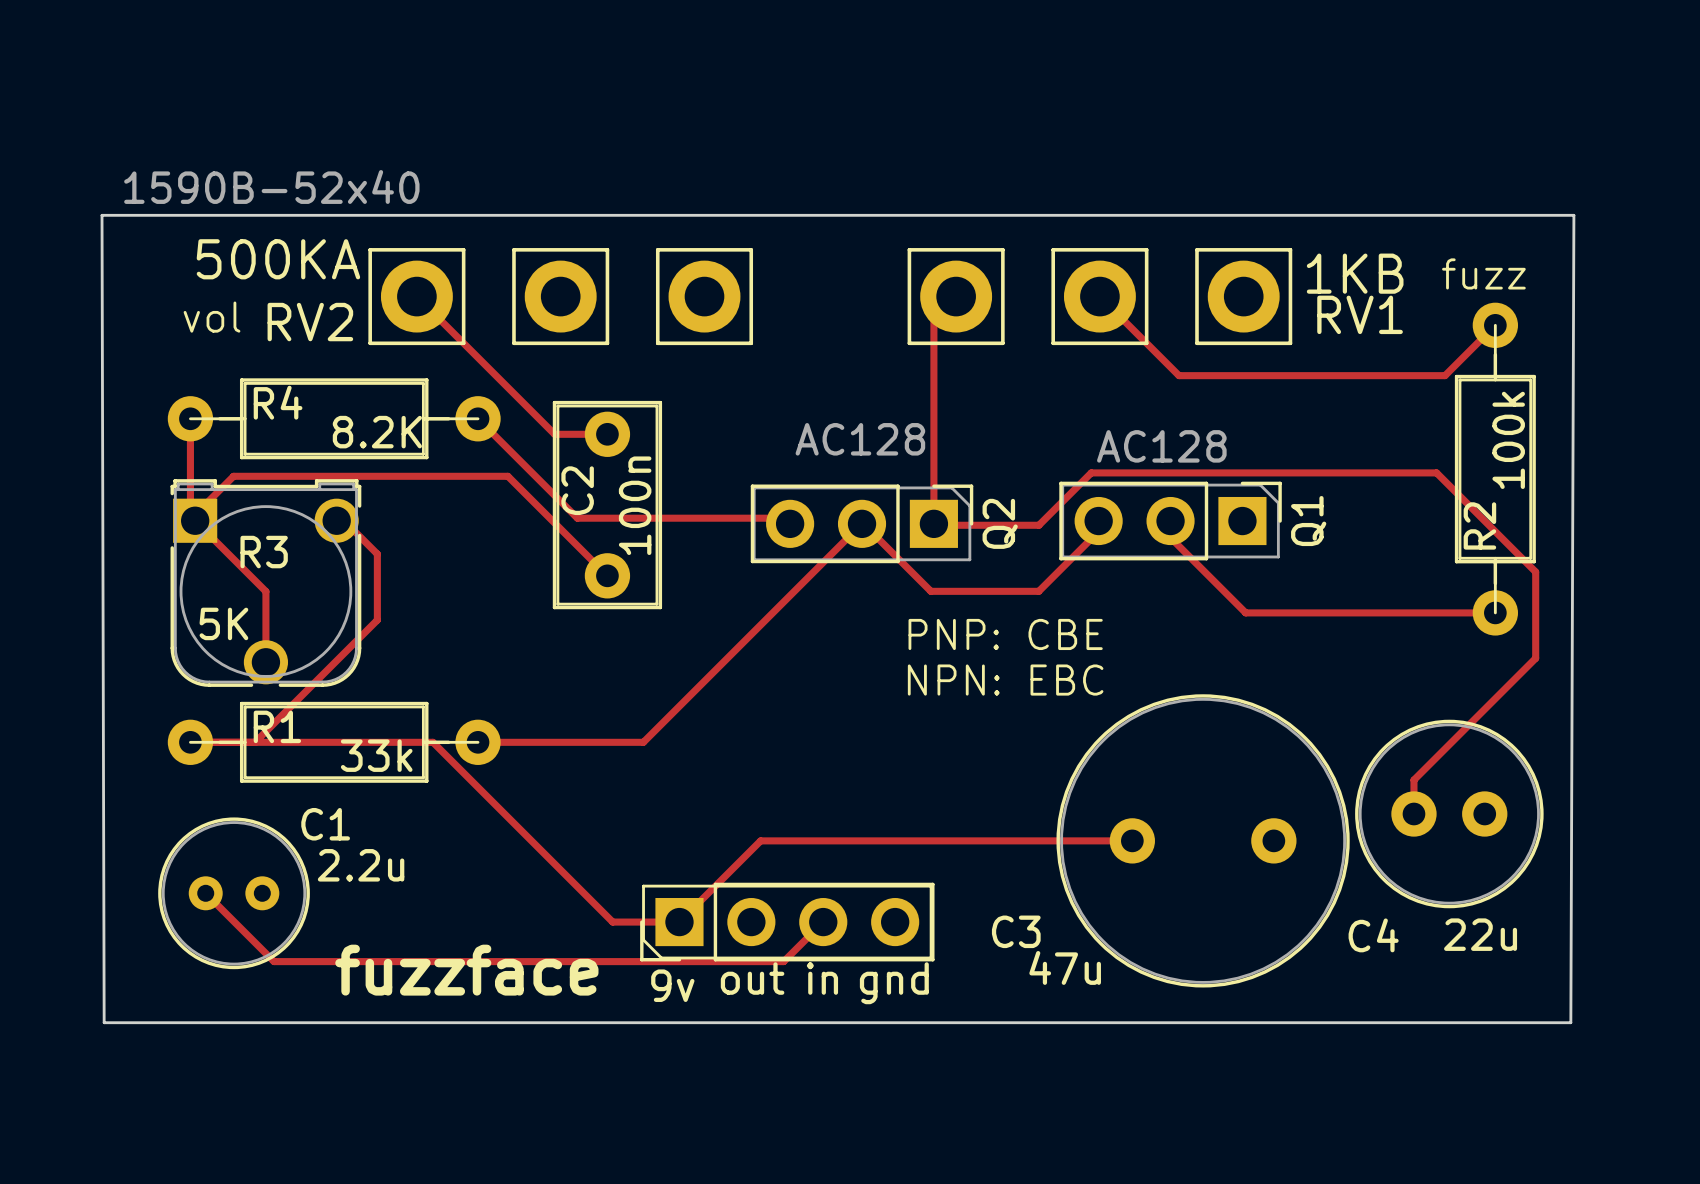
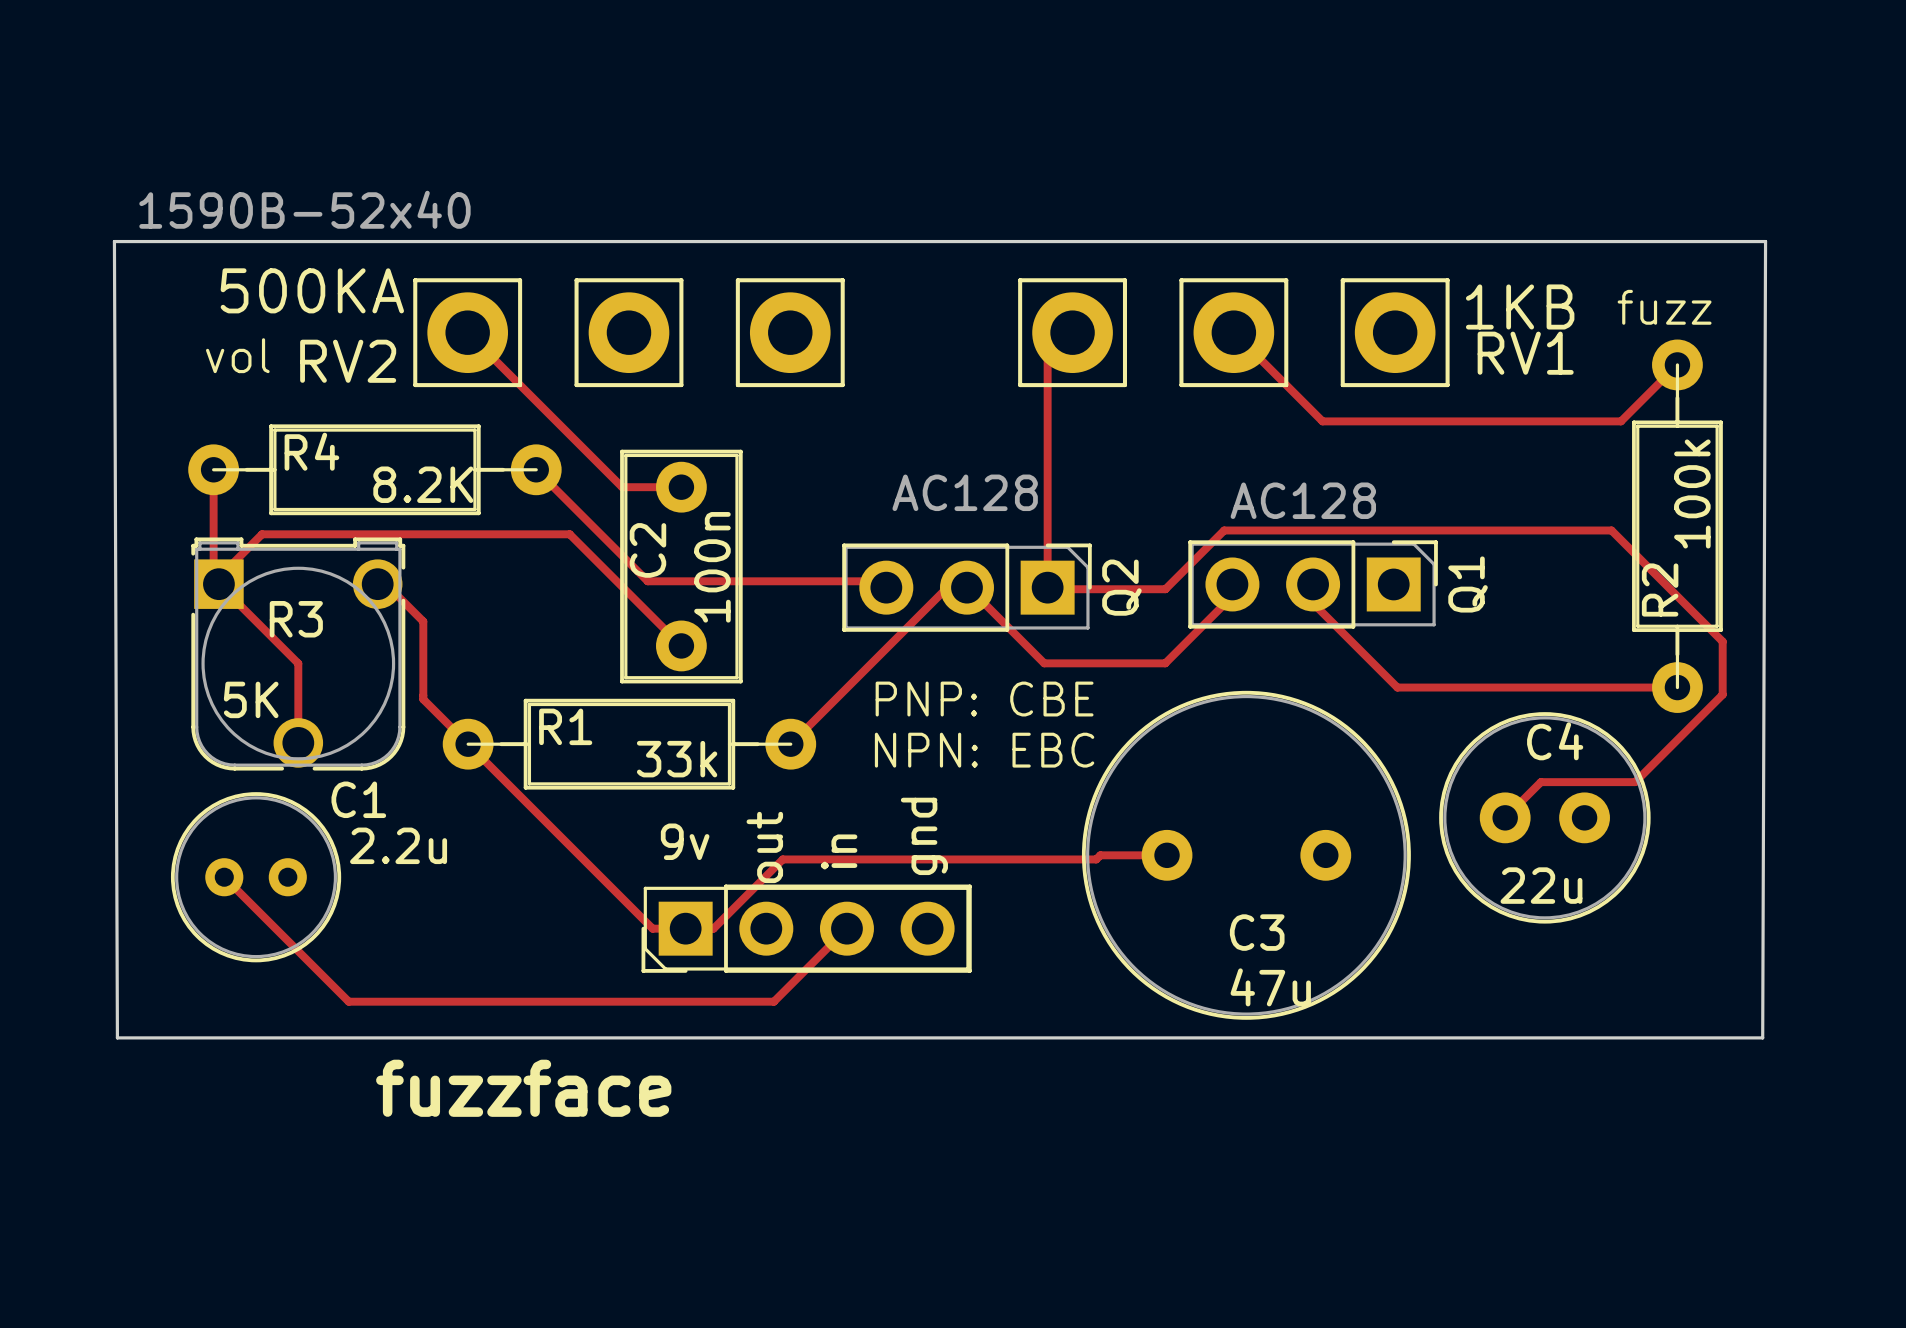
board edge: (102, 215) (104, 1022) (1570, 1022) (1573, 215) -> (114, 241) (117, 1037) (1762, 1037) (1765, 241)
track: (862, 523) (643, 742) (478, 742) -> (966, 587) (947, 587) (790, 744)
track: (1535, 619) (1535, 658) (1413, 780) (1413, 813) -> (1722, 694) (1635, 782) (1540, 782) (1505, 817)
track: (377, 620) (255, 742) -> (423, 695) (423, 699) (652, 928) (713, 928) (782, 859) (1096, 859) (1100, 855) (1167, 855)
text position: PNP: CBE (1005, 634) -> PNP: CBE (984, 699)
text position: NPN: EBC (1005, 680) -> NPN: EBC (984, 750)
track: (190, 742) (432, 742) (612, 922) (679, 922) (760, 840) (1143, 840) -> none
R1 position: (334, 742) -> (629, 744)
track: none -> (224, 877) (348, 1001) (773, 1001) (846, 928)
C4 position: (1449, 813) -> (1544, 817)
C3 position: (1203, 840) -> (1246, 855)
track: (205, 893) (274, 961) (783, 961) (823, 922) -> none
C1 position: (234, 893) -> (256, 877)
part position: (787, 922) -> (806, 928)
C3 name position: C3 (1016, 931) -> C3 (1257, 932)
C4 value position: 22u (1480, 934) -> 22u (1541, 885)
C4 name position: C4 (1373, 935) -> C4 (1555, 741)
C3 value position: 47u (1065, 967) -> 47u (1270, 987)
text rotation: 0° (752, 978) -> 90° counterclockwise (764, 847)
text position: out (752, 978) -> out (764, 847)
text rotation: 0° (822, 978) -> 90° counterclockwise (839, 851)
text position: in (822, 978) -> in (839, 851)
text rotation: 0° (894, 983) -> 90° counterclockwise (924, 836)
text position: gnd (894, 983) -> gnd (924, 836)
text position: 9v (672, 985) -> 9v (685, 841)

